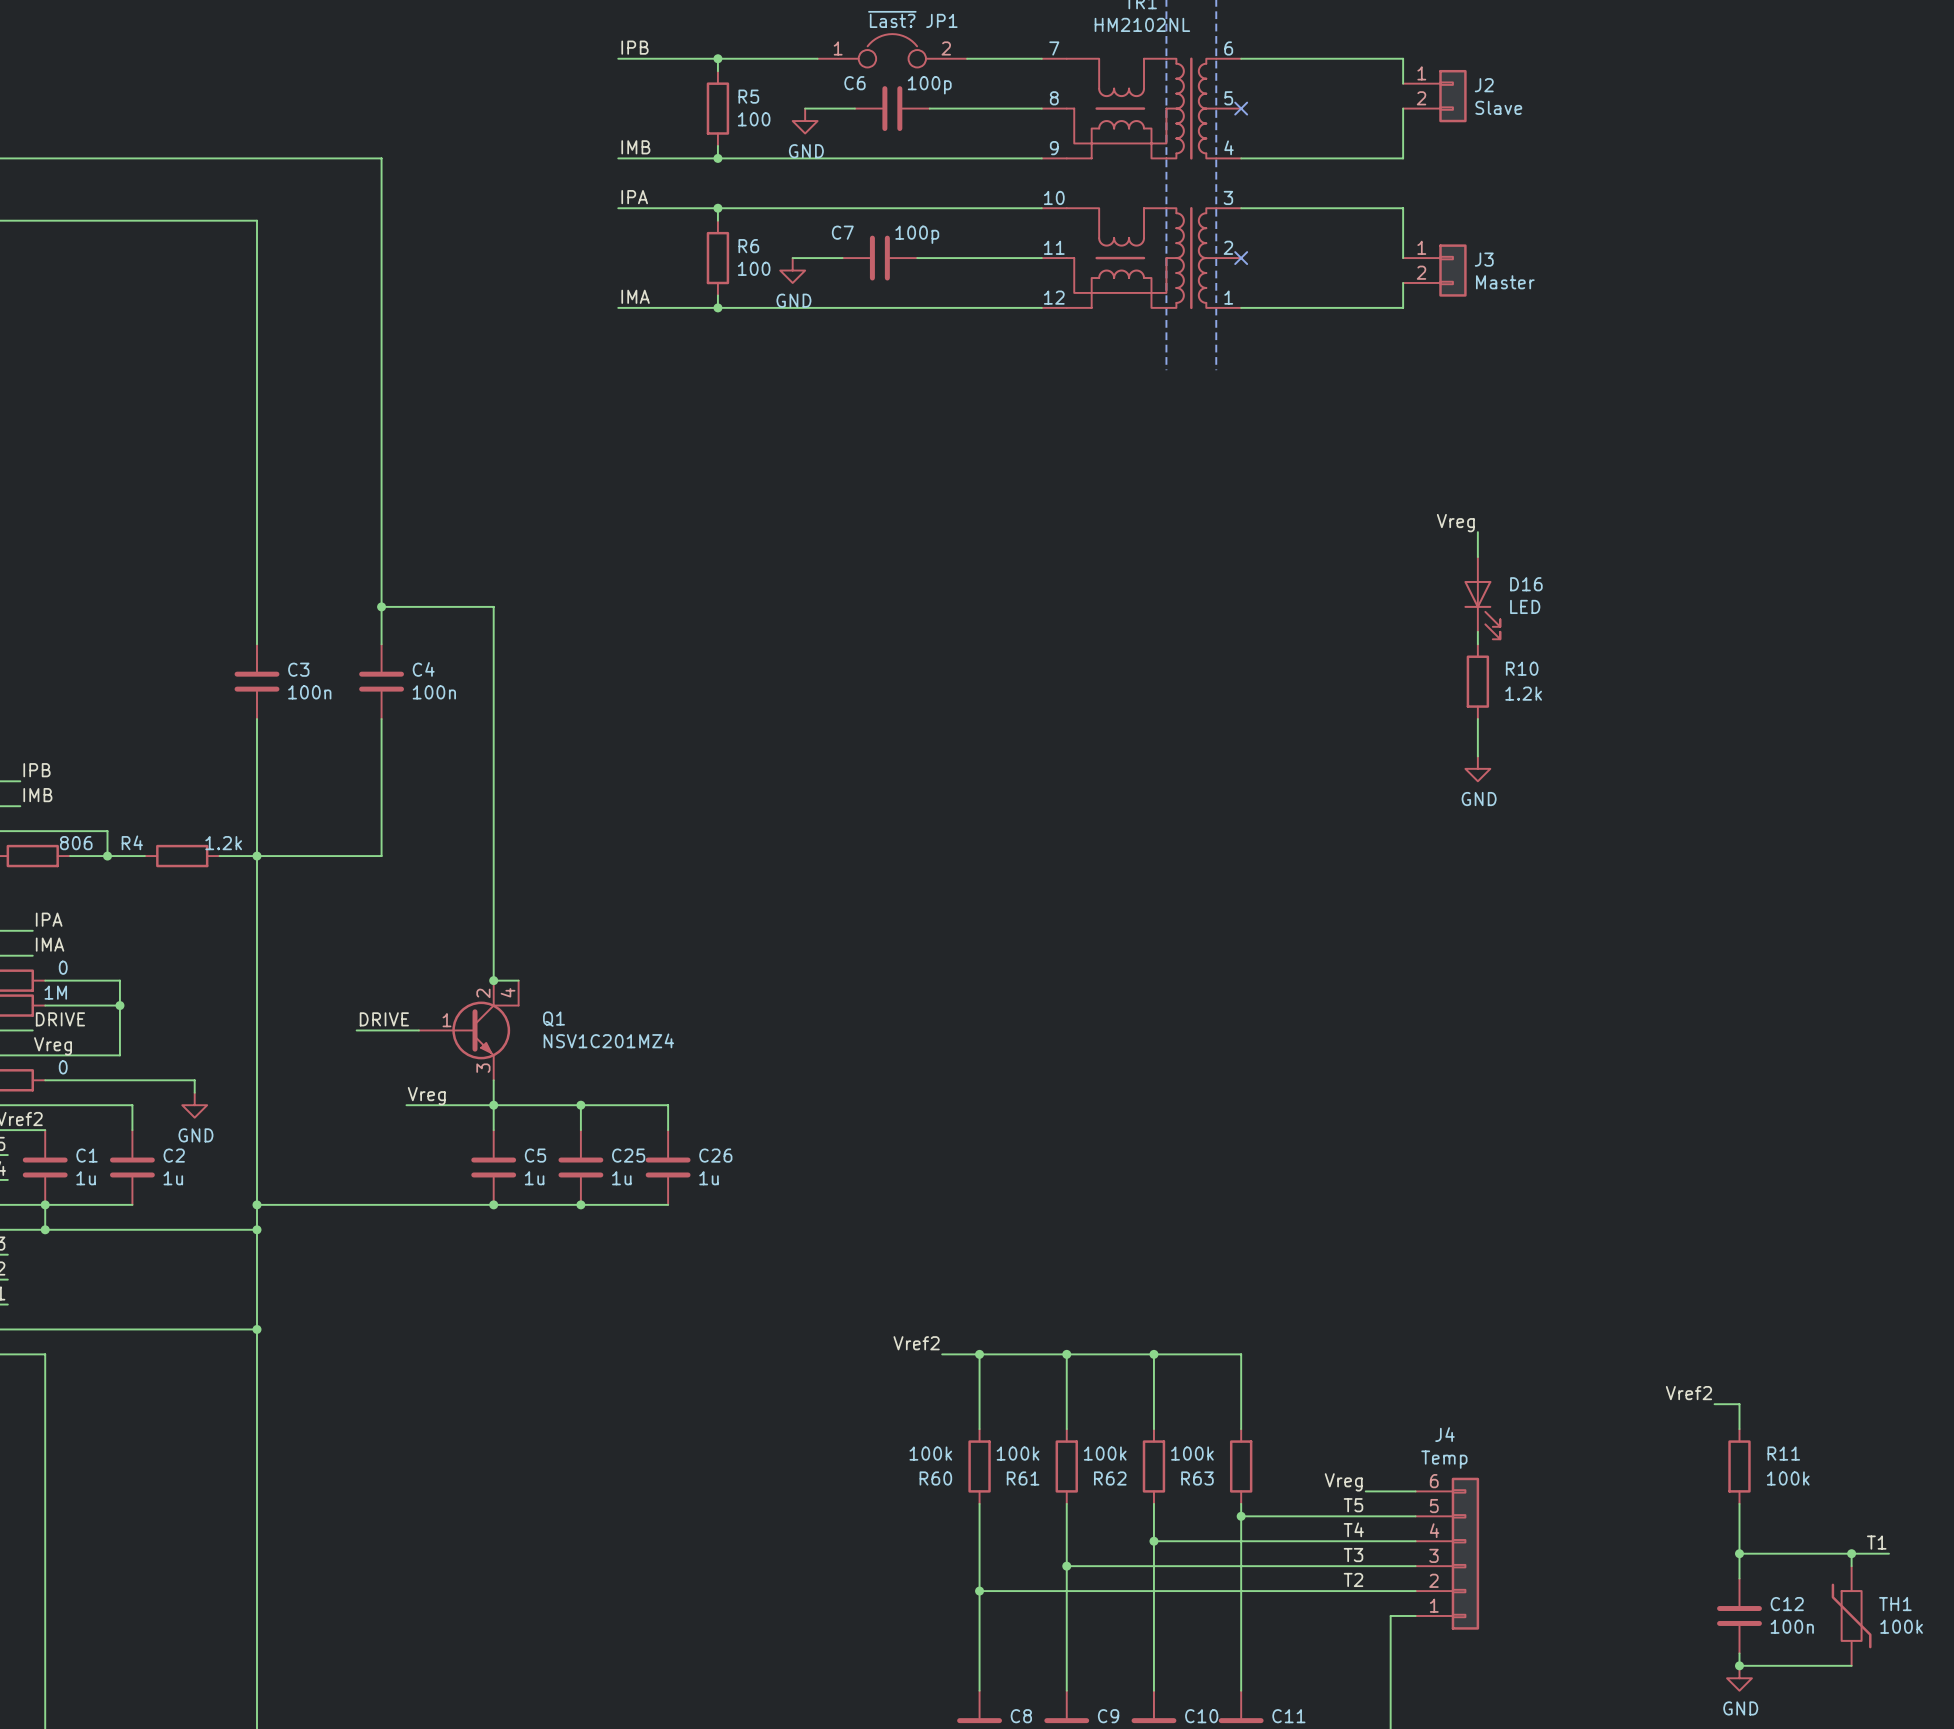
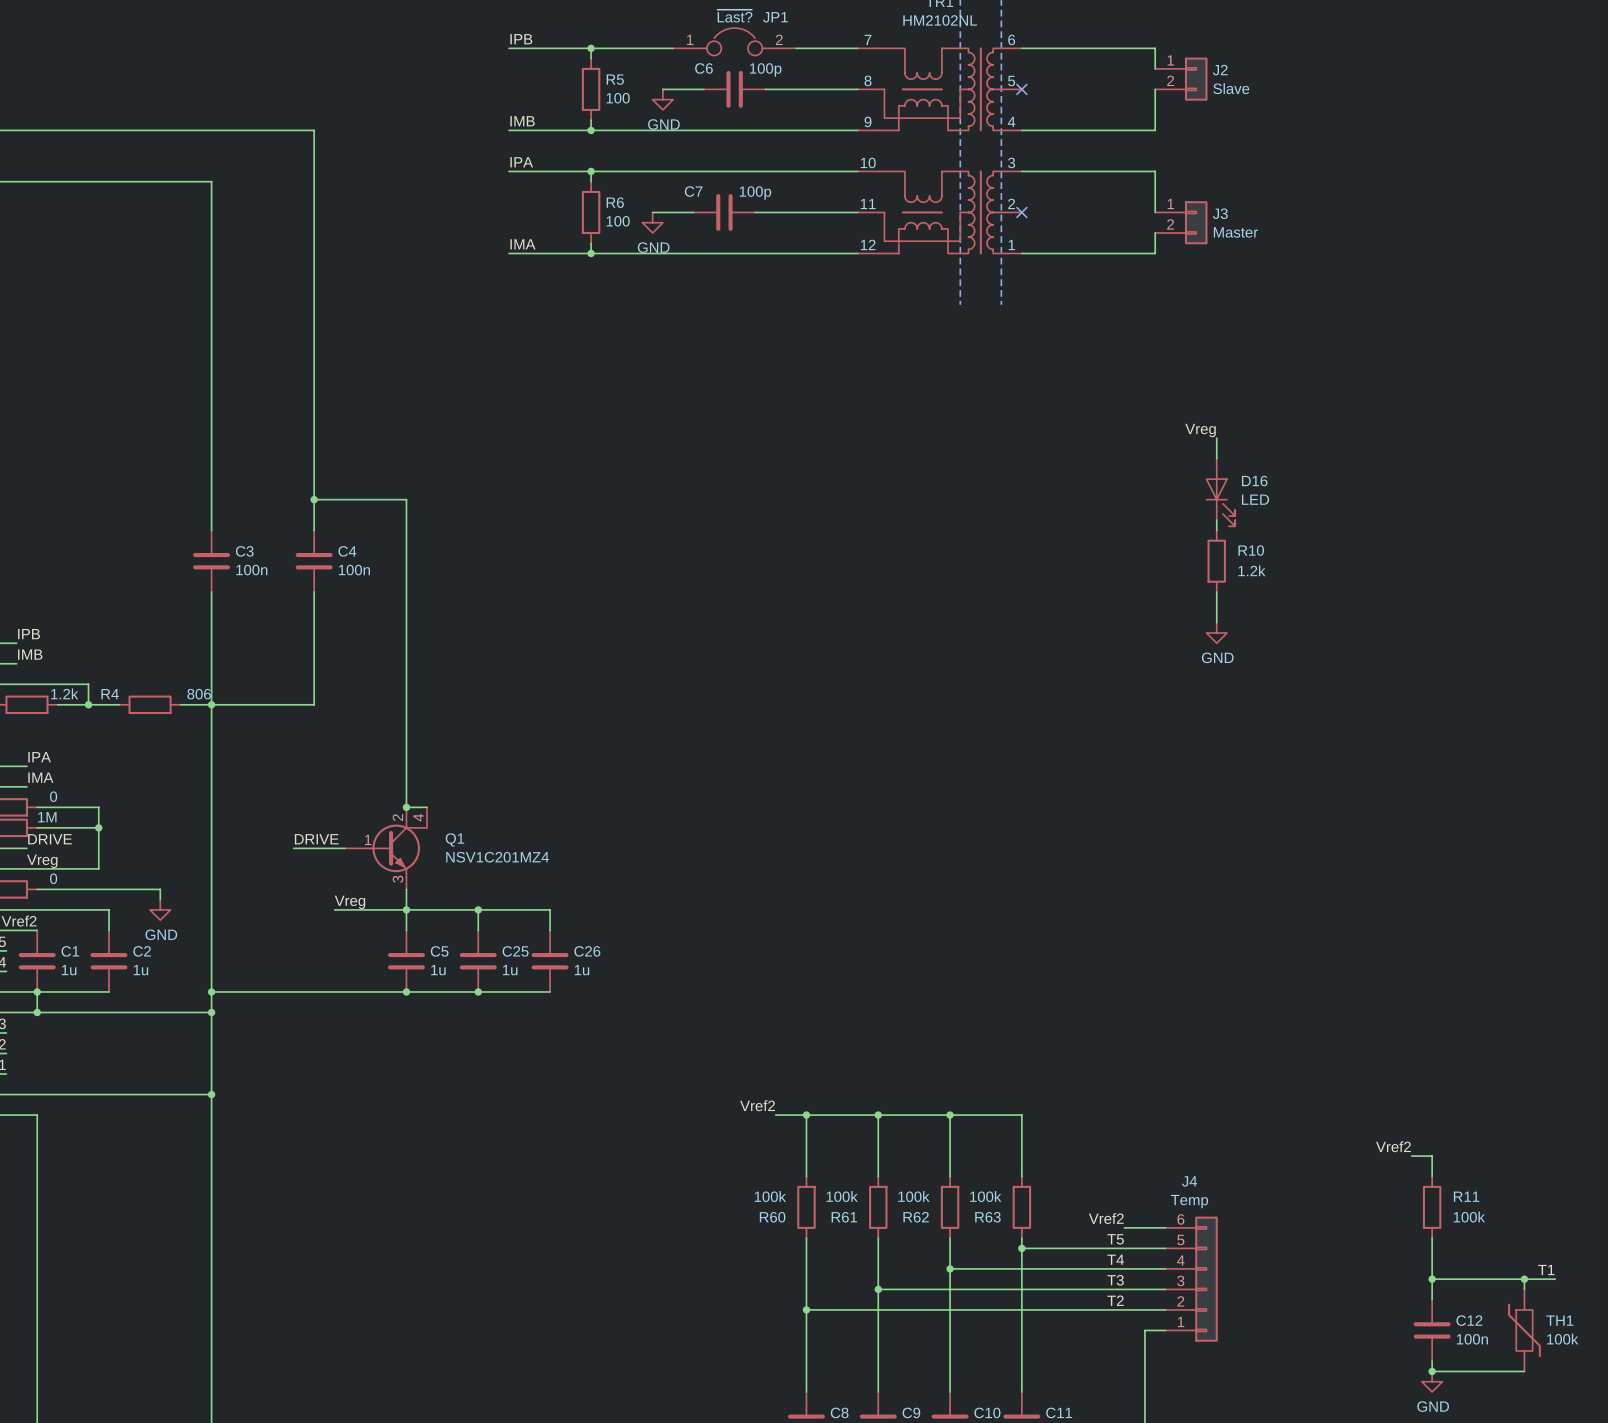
part value: 806 (76, 843) -> 1.2k (64, 693)
R4 value: 1.2k (223, 843) -> 806 (199, 694)
label: Vreg (1343, 1482) -> Vref2 (1106, 1218)

